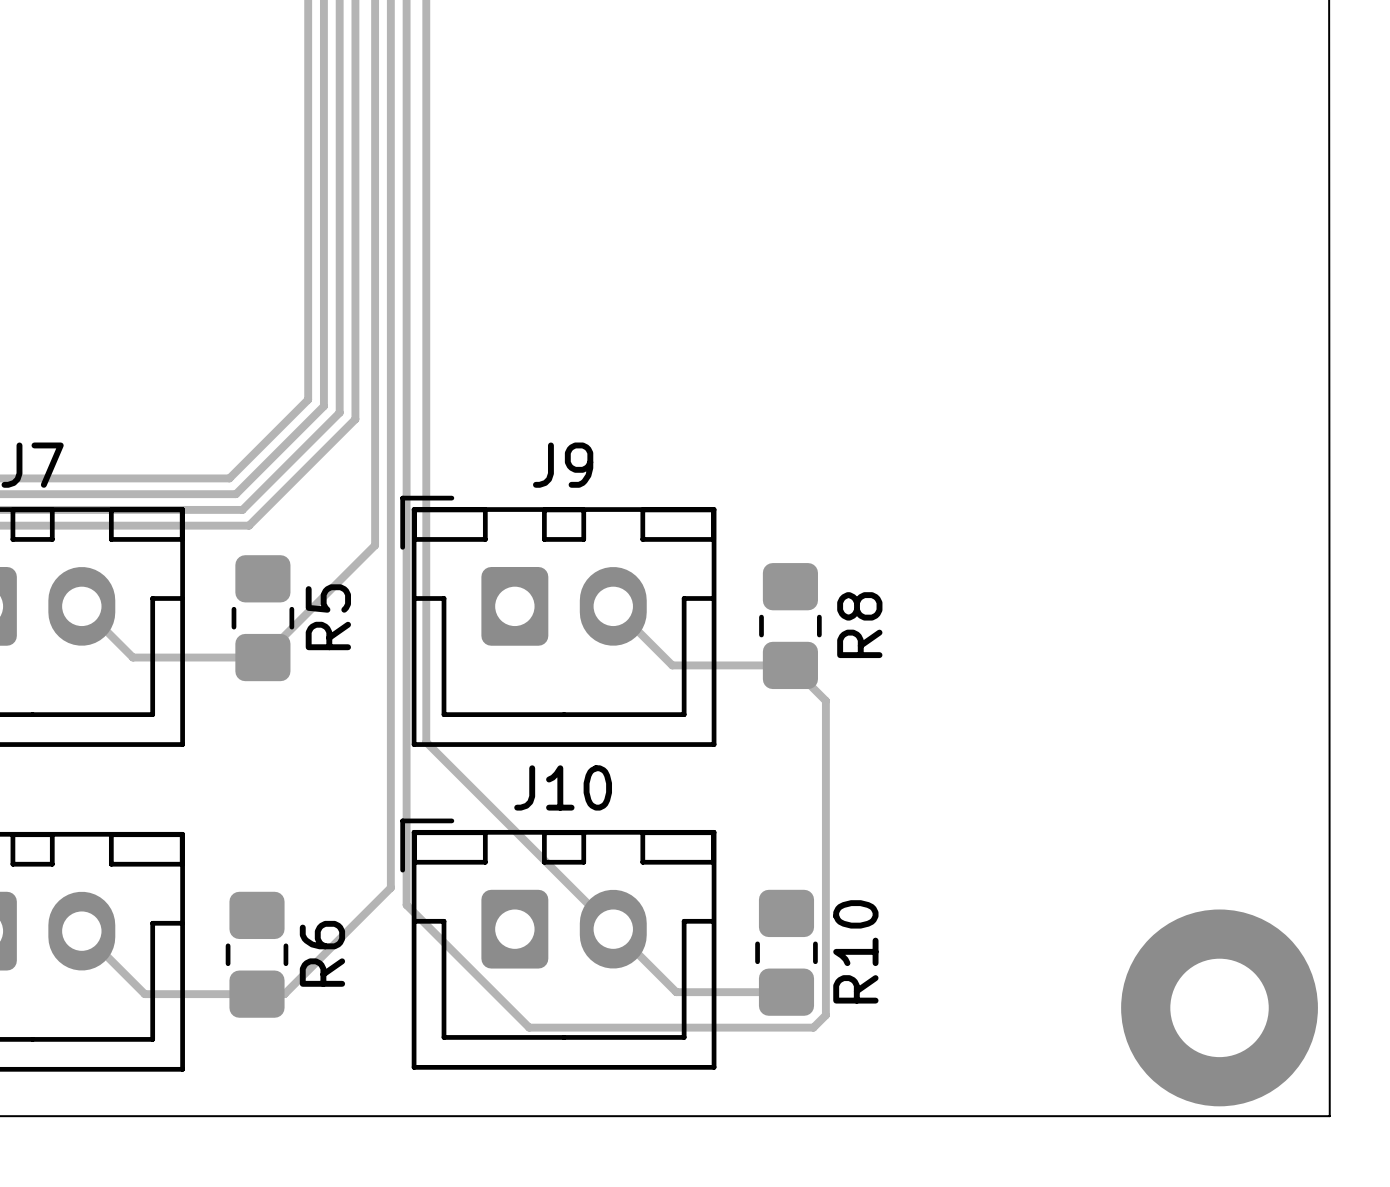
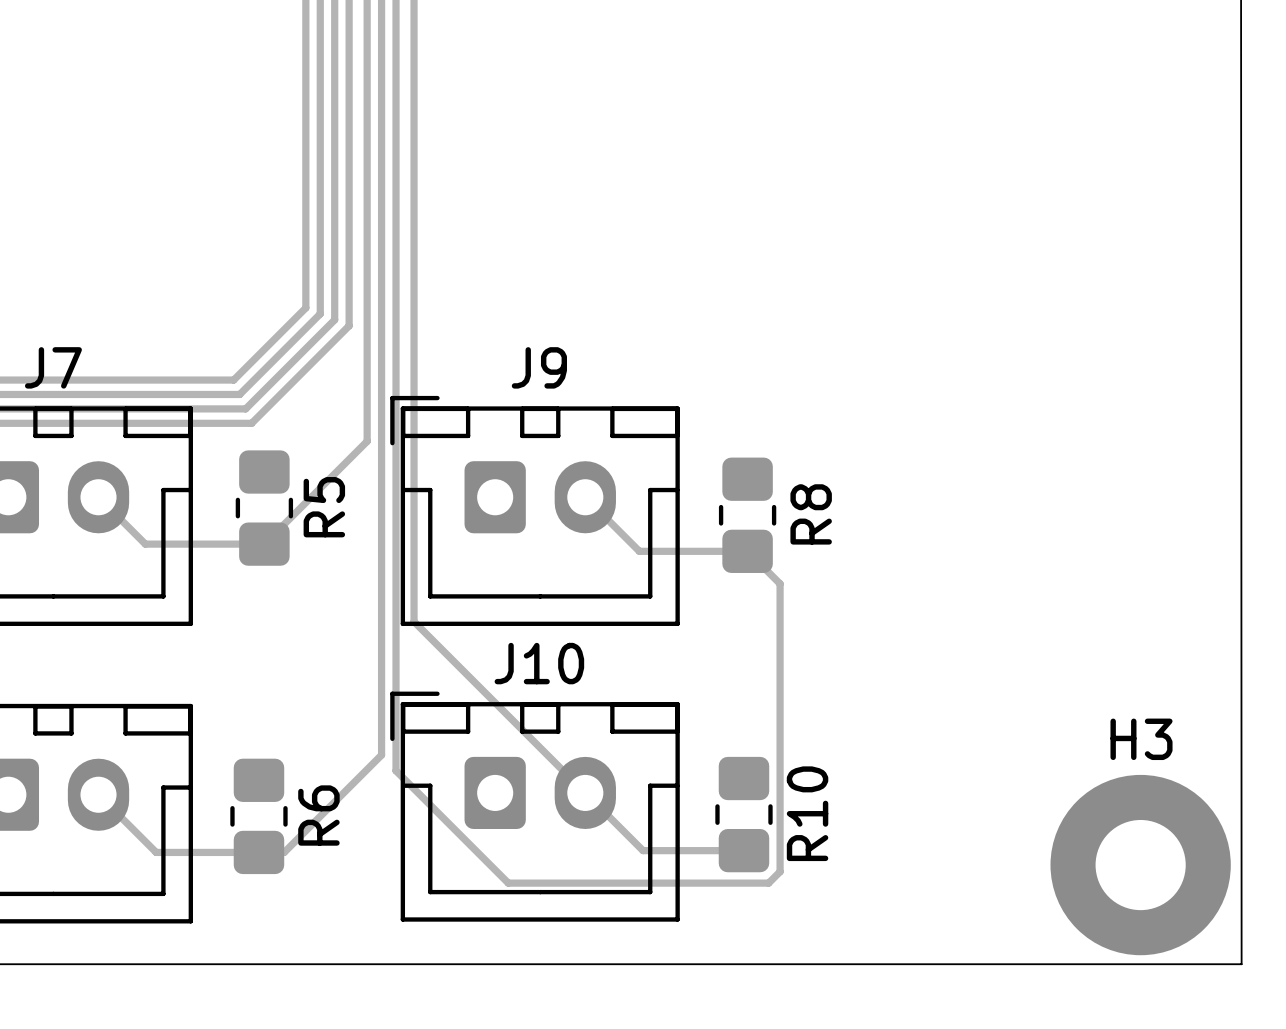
H3 name: none -> H3 (1141, 739)

